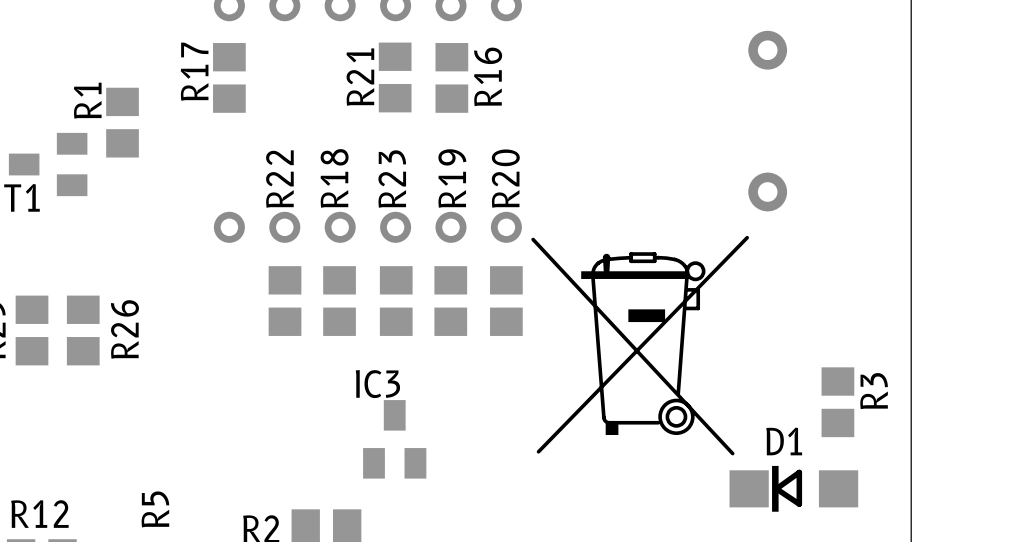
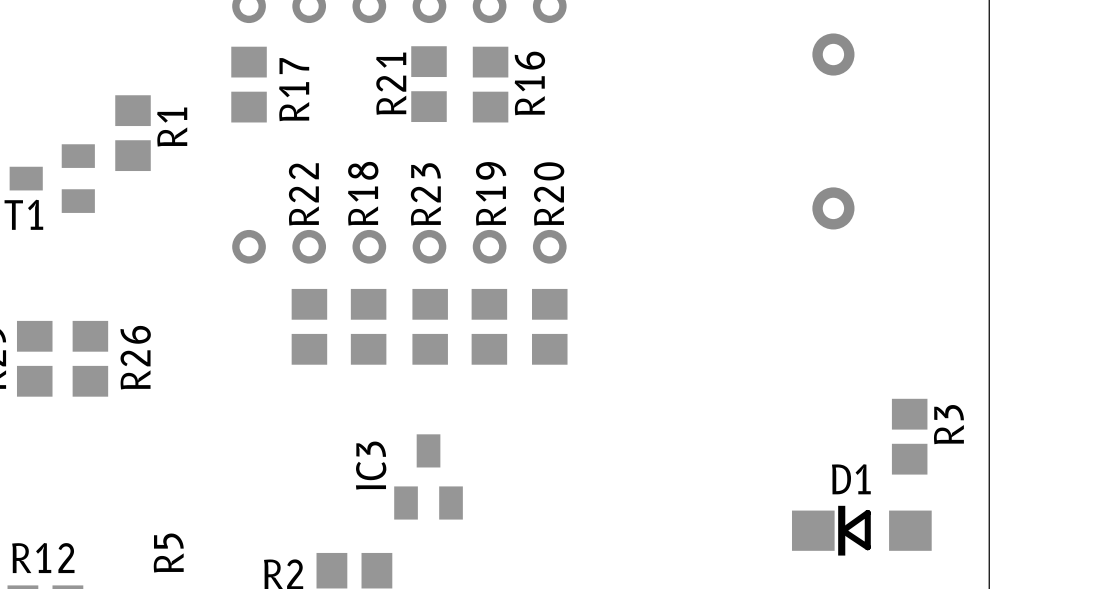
R17 name position: R17 (194, 71) -> R17 (294, 89)
R1 name position: R1 (87, 100) -> R1 (172, 127)
drawing: [531, 235, 750, 456] -> none
IC3 name rotation: 0° (377, 384) -> 90° counterclockwise (371, 465)

